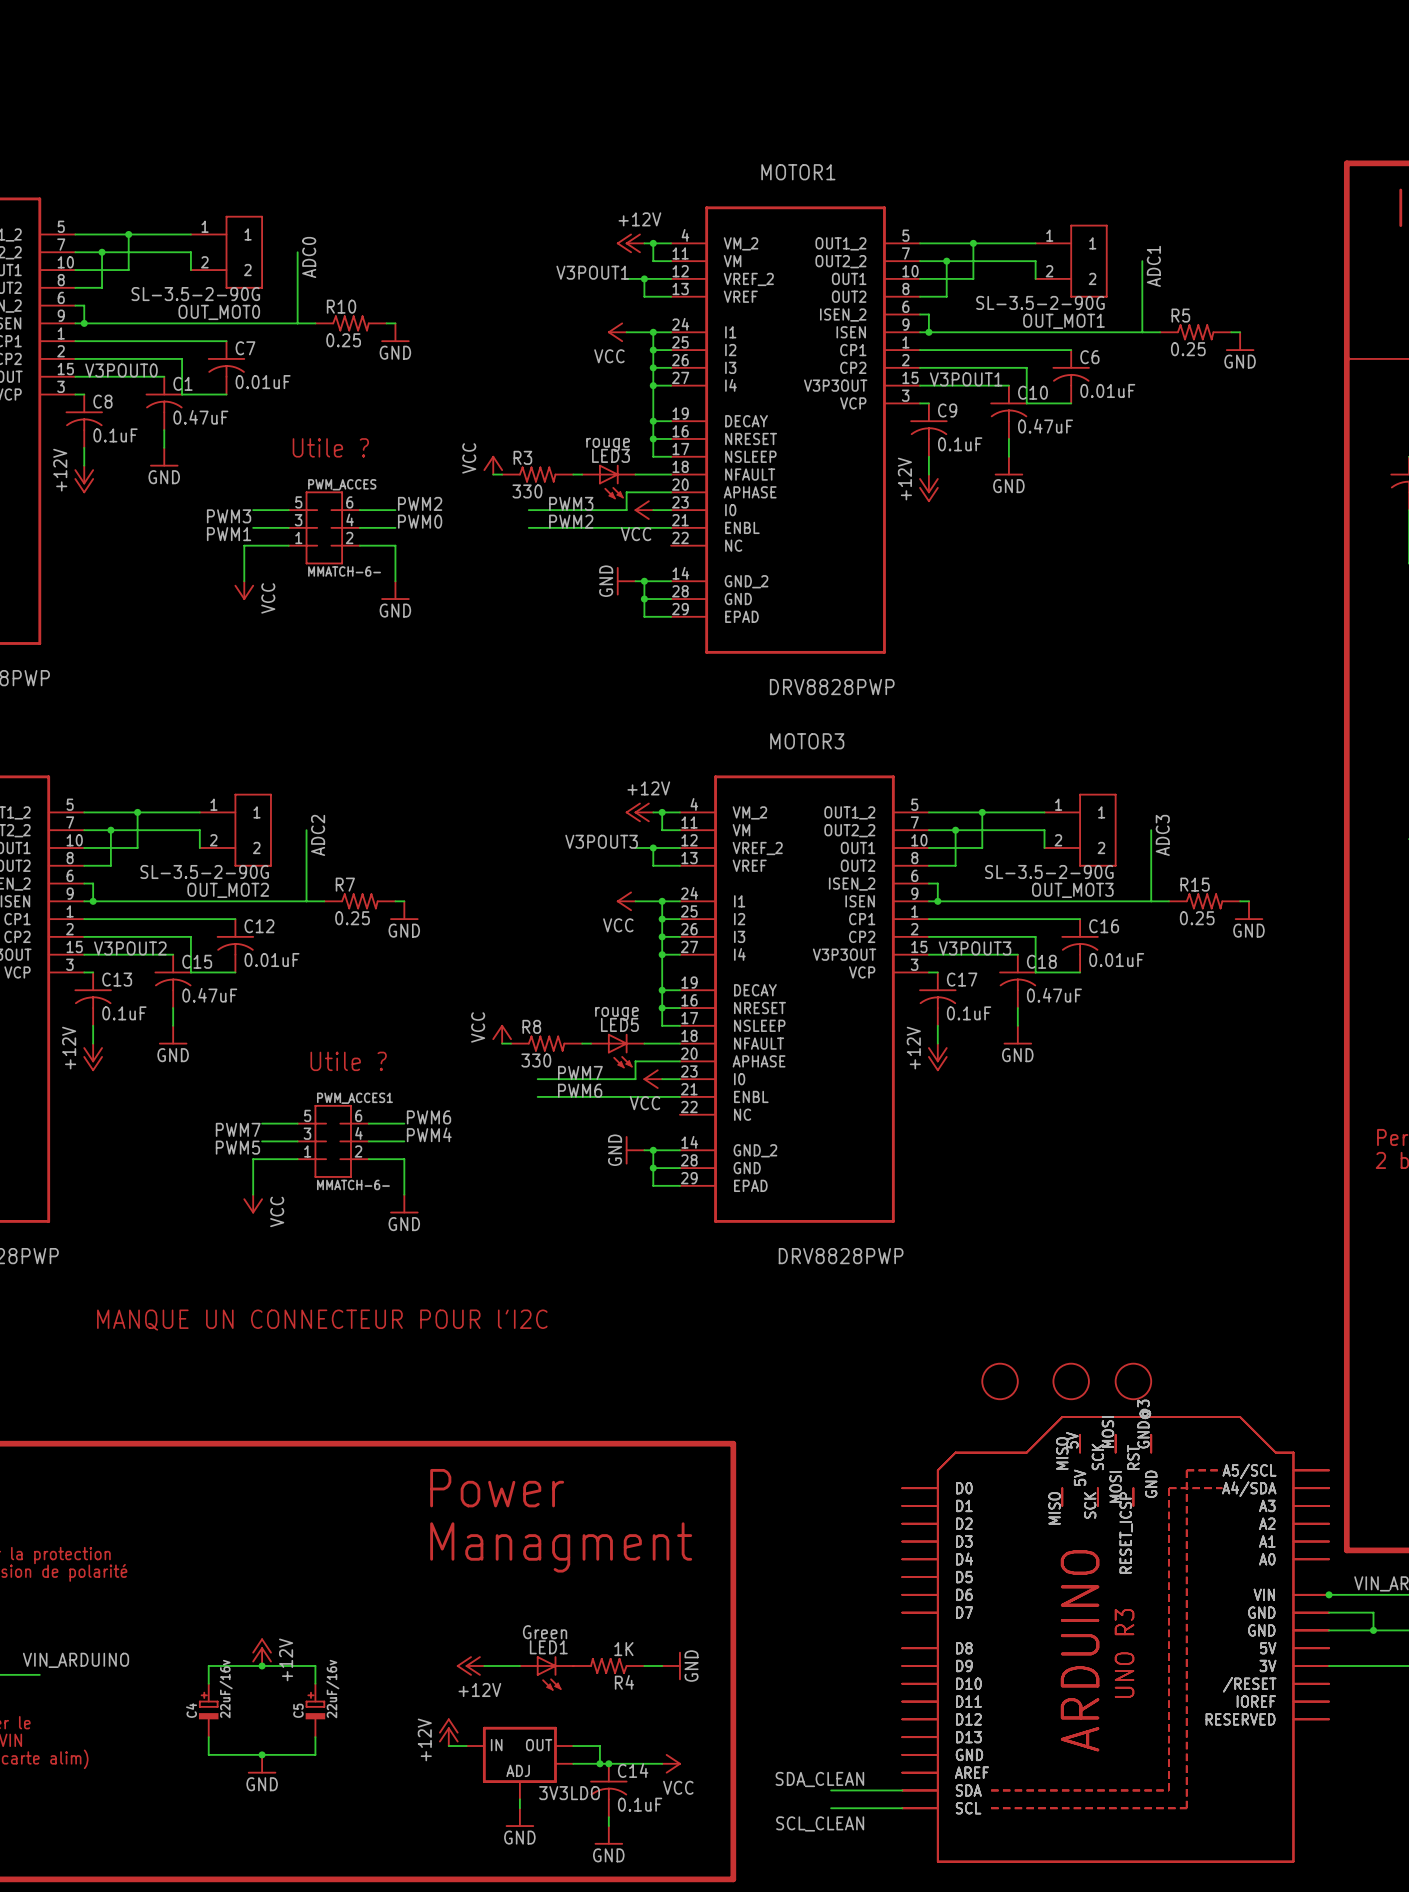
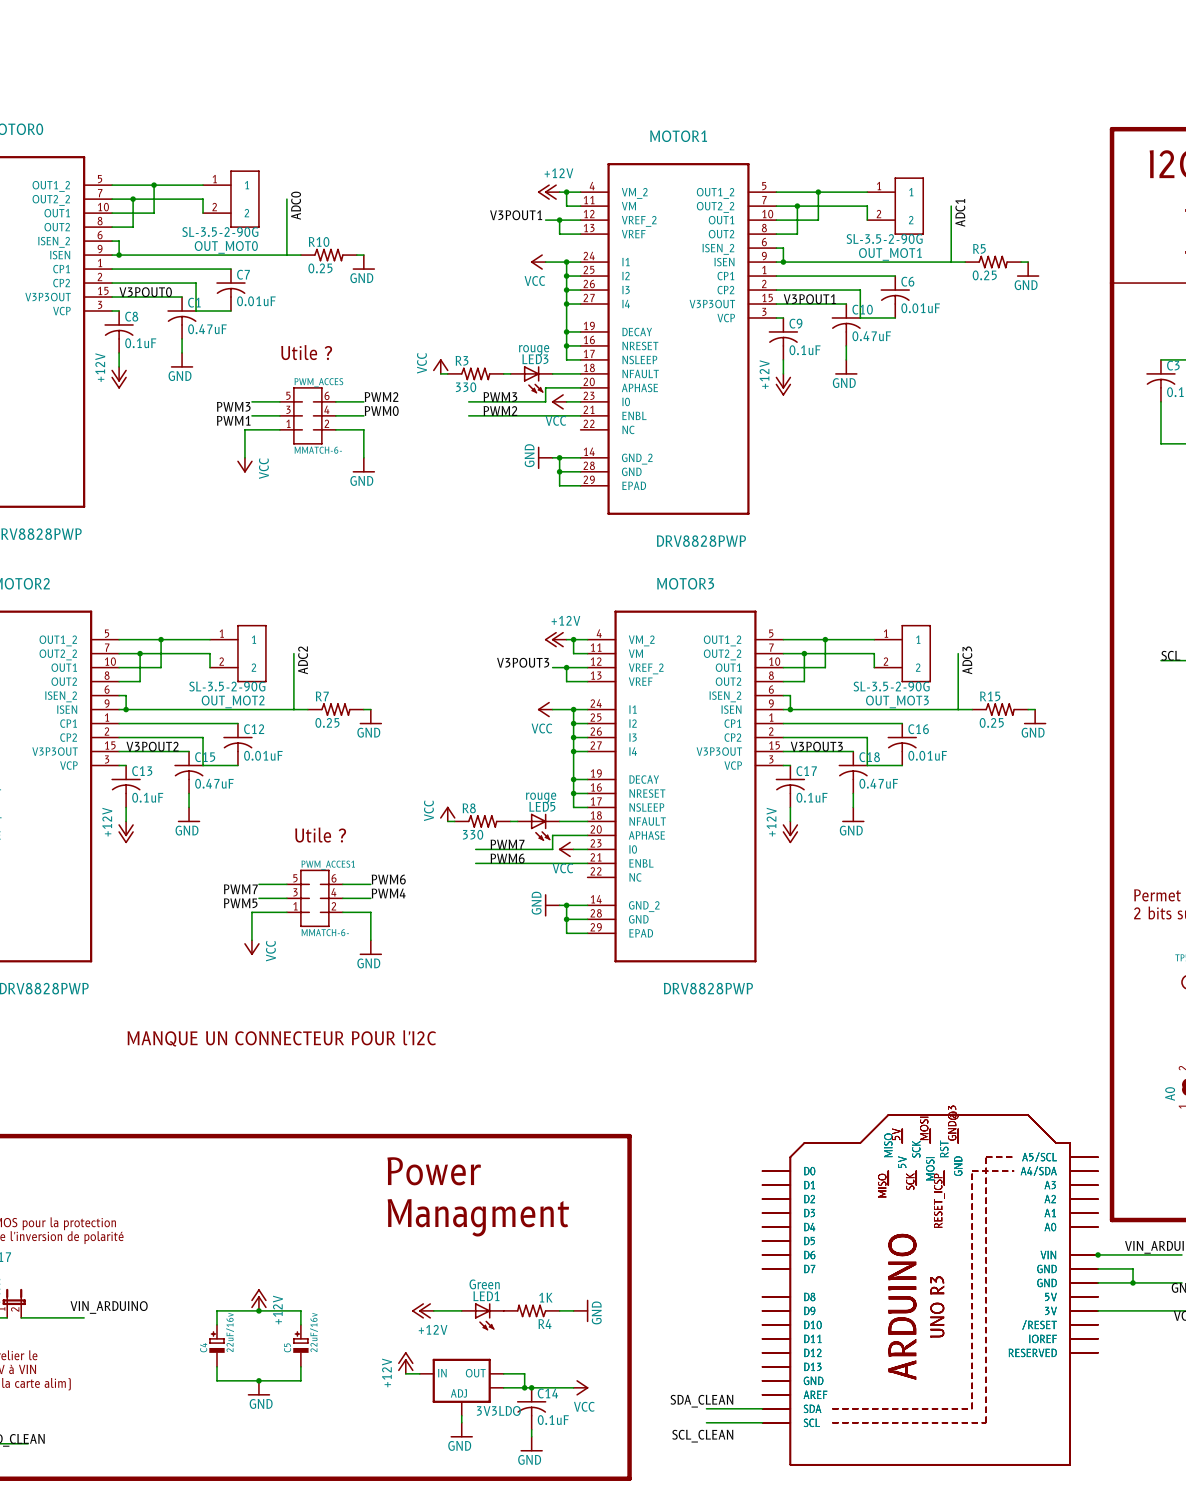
part: (1000, 1381) -> none
part: (1071, 1381) -> none
part: (1133, 1381) -> none

